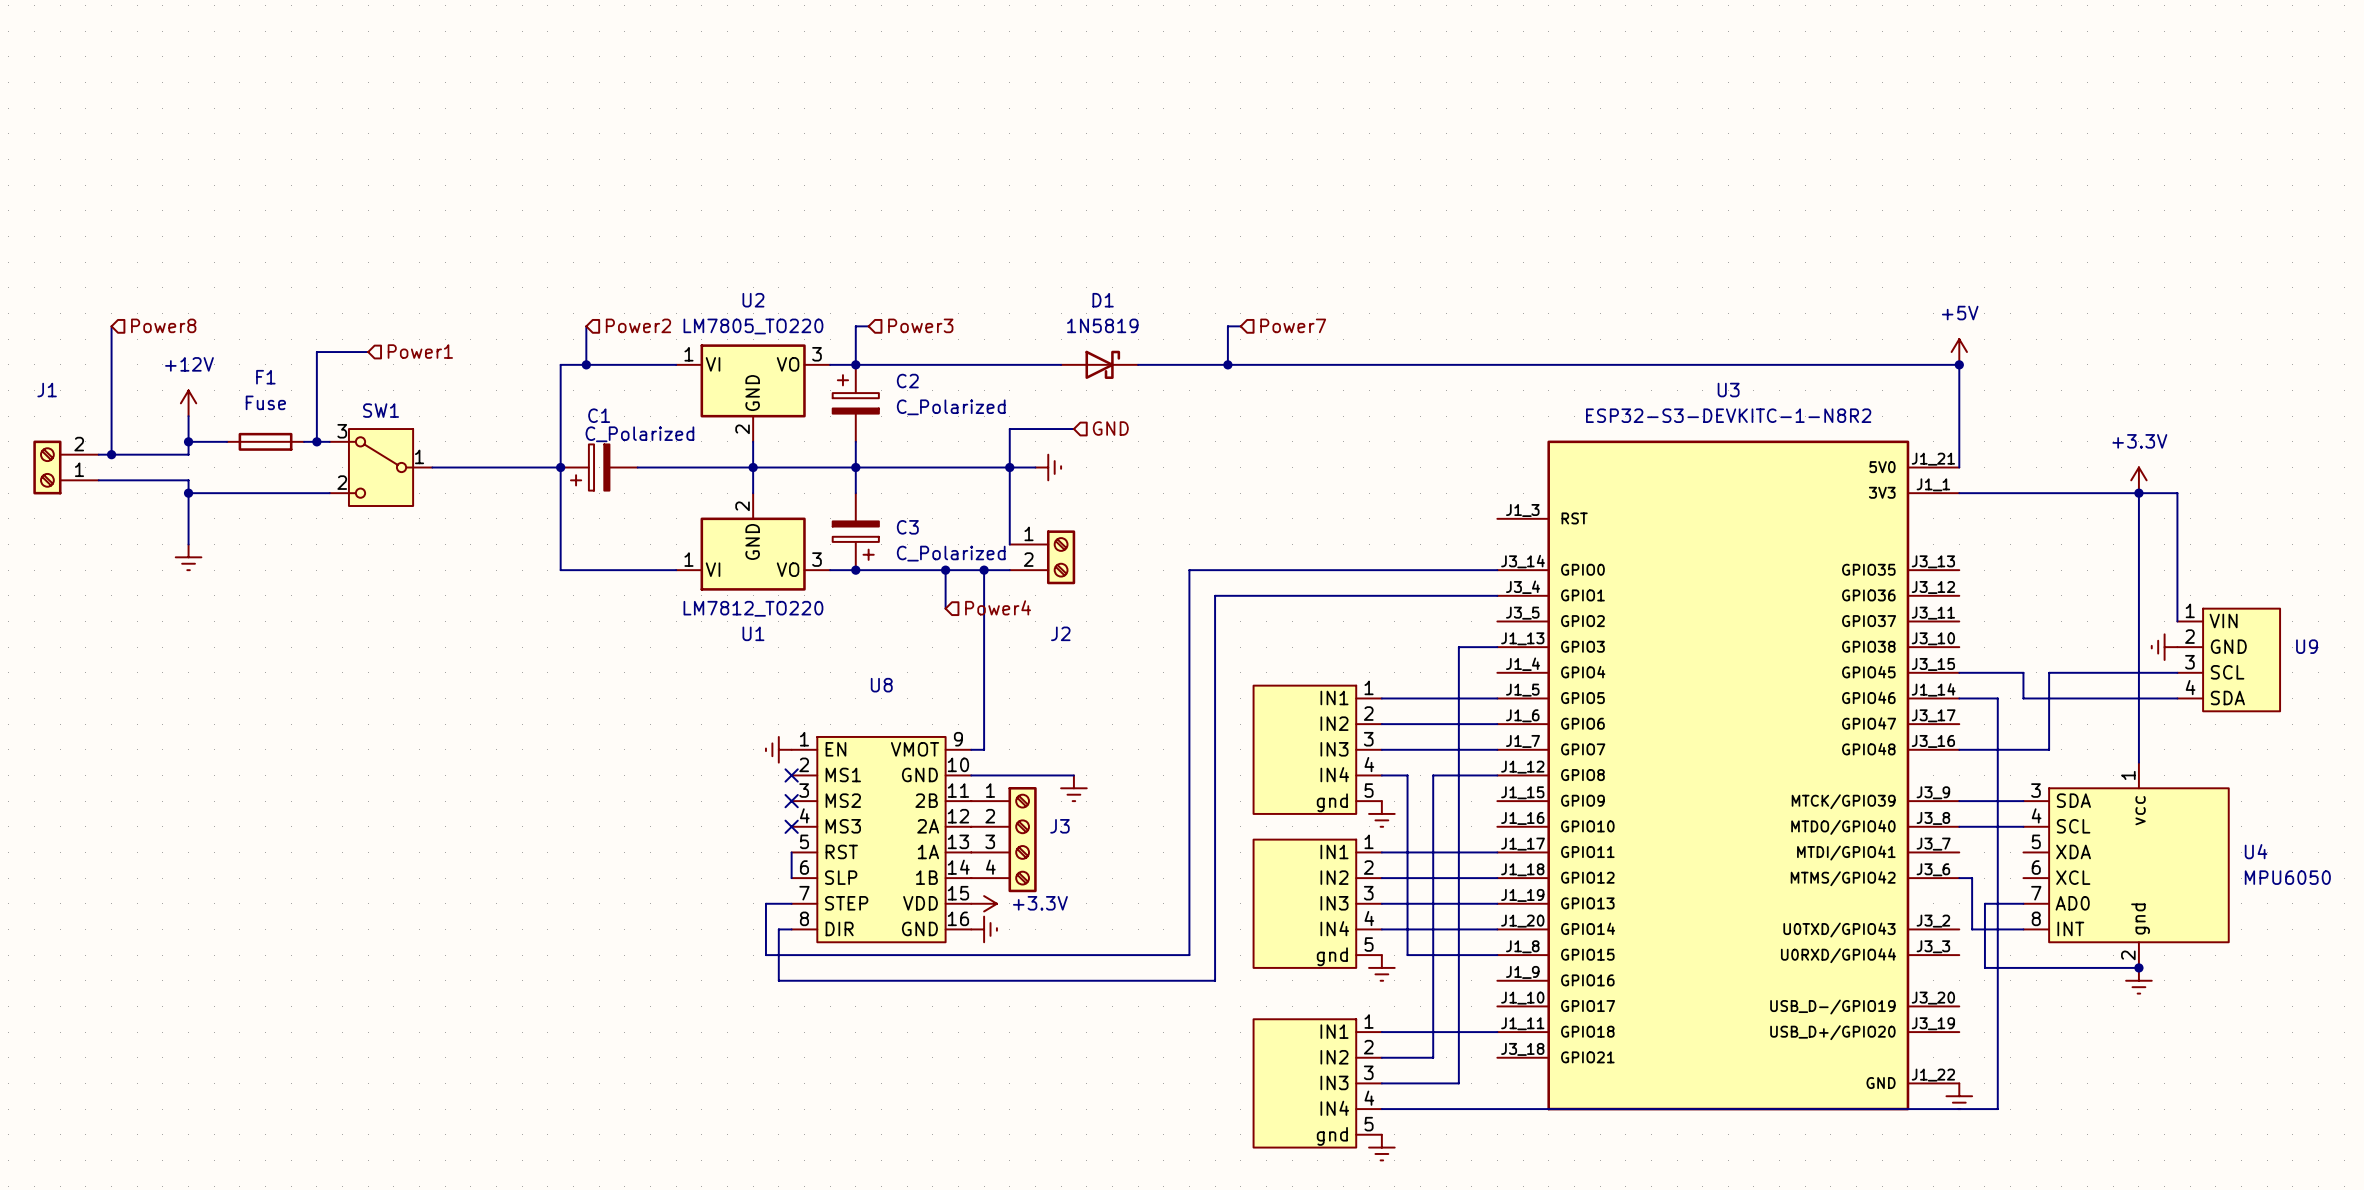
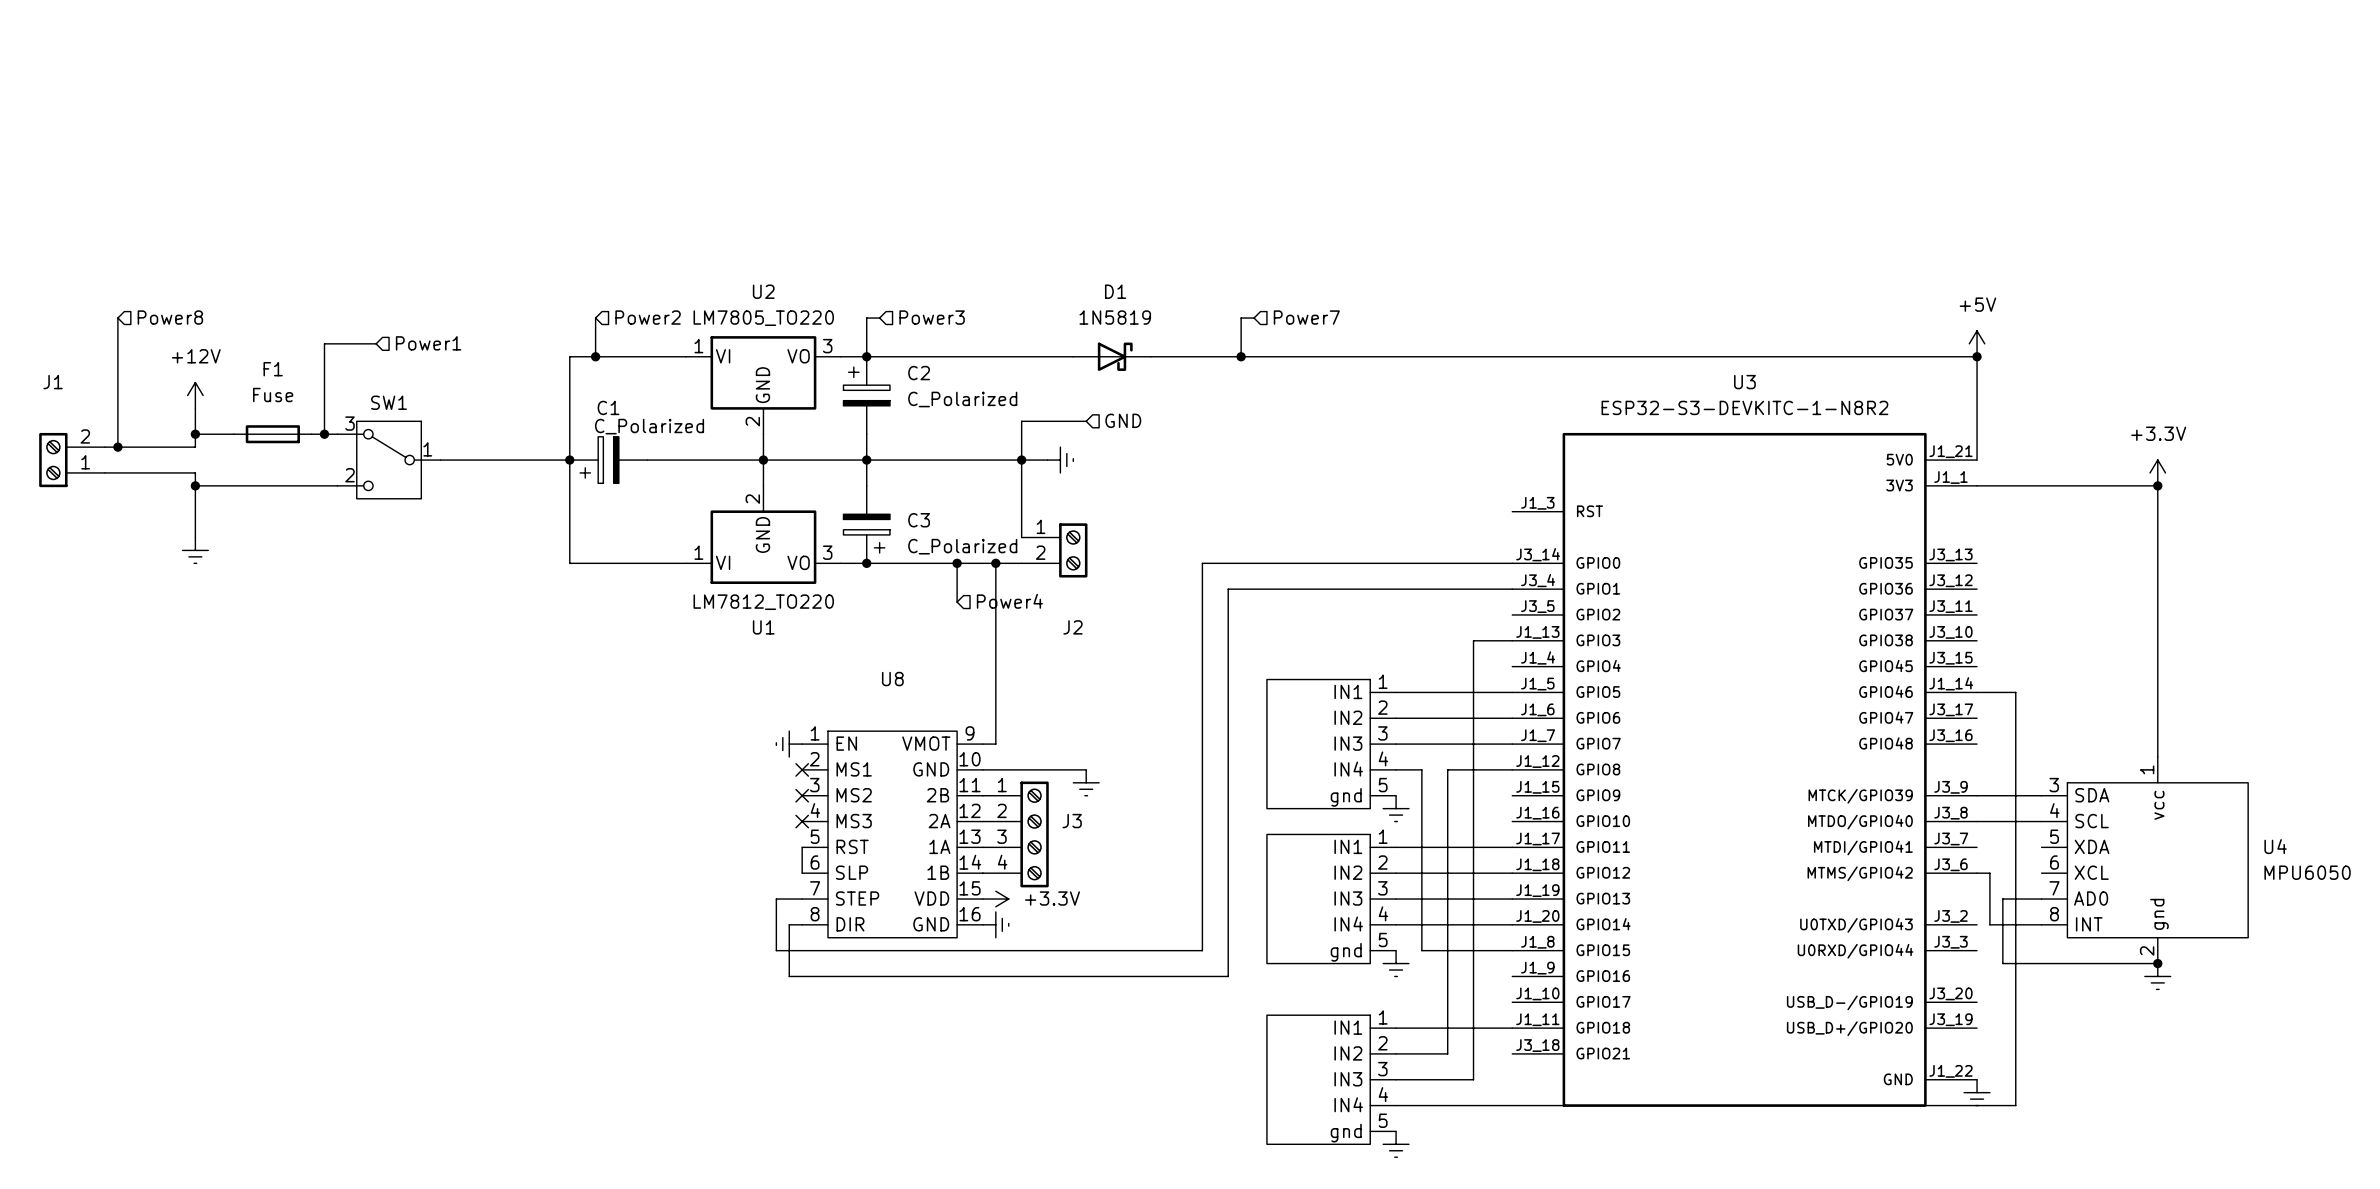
wire: (2138, 493) (2177, 493) (2177, 621) -> none
power symbol: (2164, 647) -> none
U9: (2228, 659) -> none
wire: (1959, 672) (2023, 672) (2023, 698) (2177, 698) -> none
wire: (2177, 672) (2049, 672) (2049, 749) (1959, 749) -> none

